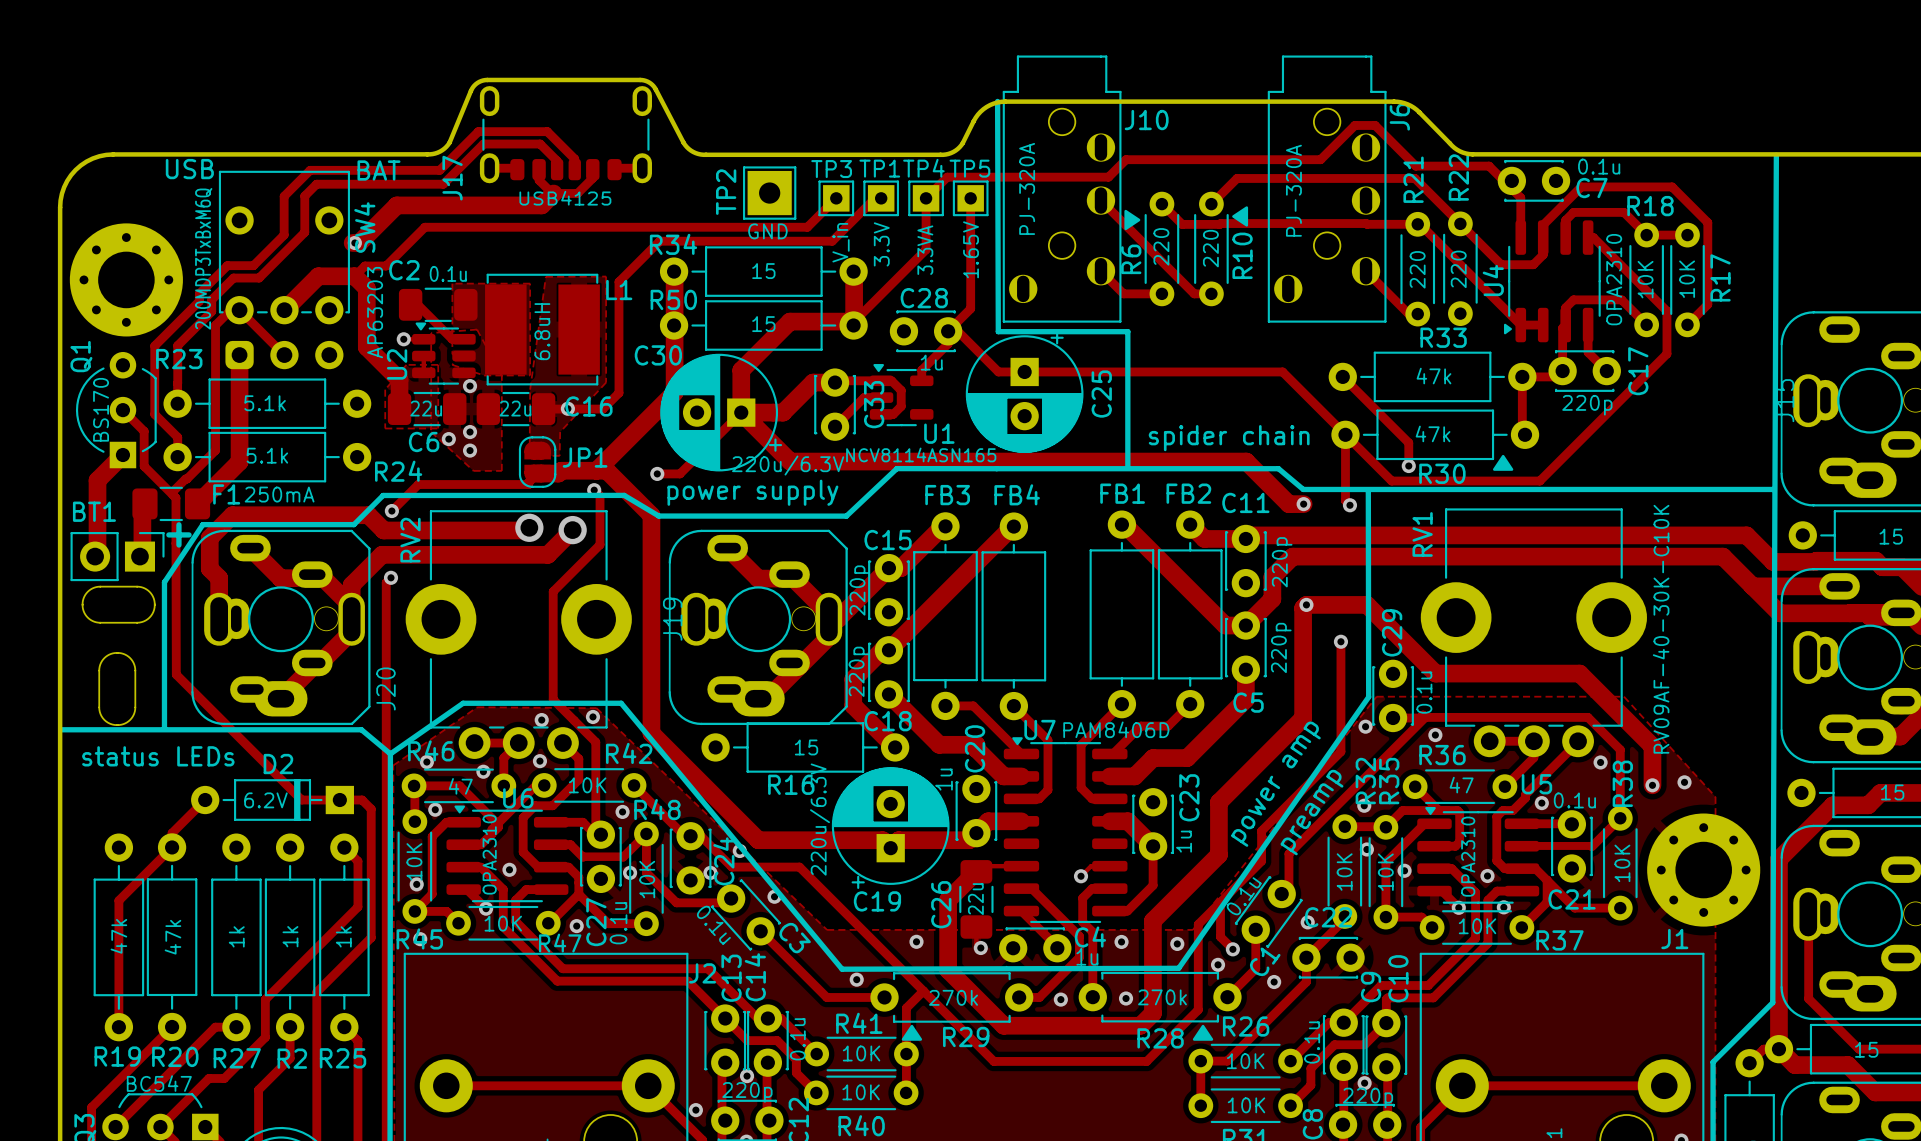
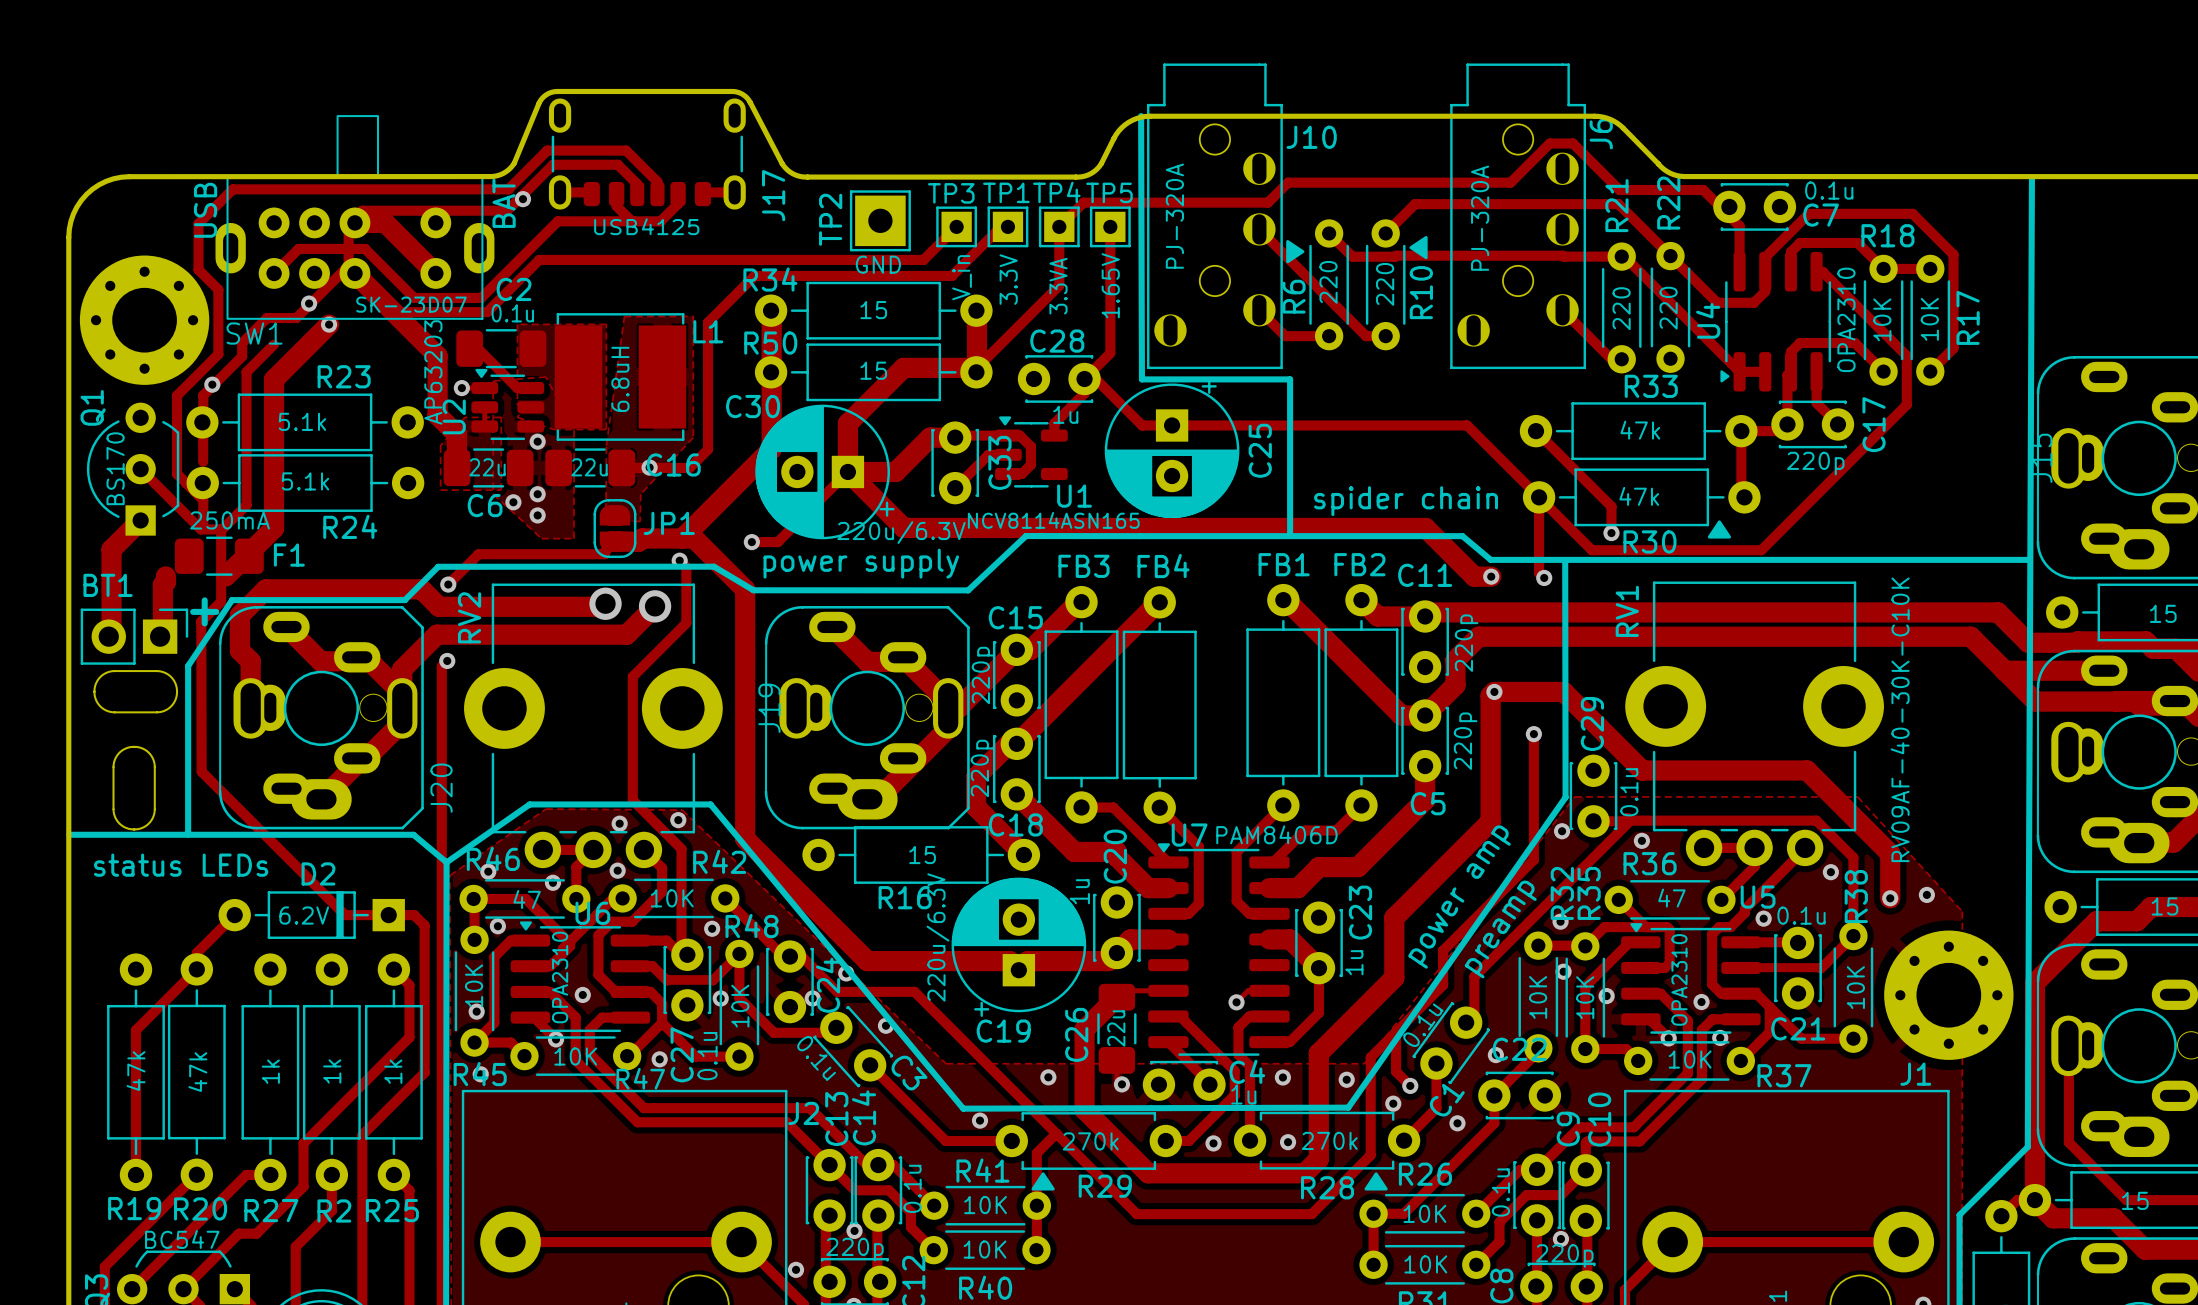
track: (444, 165) (439, 170) (310, 170) (284, 196) (284, 234) (253, 265) (227, 265) (199, 293) (199, 301) (190, 309) -> (508, 189) (232, 189) (198, 223) (198, 269) (218, 289) (218, 354)
text rotation: 0° (189, 169) -> 90° counterclockwise (205, 210)
text rotation: 0° (378, 170) -> 90° counterclockwise (504, 203)
text position: BAT (378, 170) -> BAT (504, 203)
via: none -> (522, 199)
J17 name position: J17 (452, 178) -> J17 (773, 195)
SW1: none -> SK-23D07 (354, 217)
track: none -> (631, 221) (557, 221) (481, 297) (414, 297) (365, 248) (298, 248) (274, 273)
track: (553, 193) (541, 205) (396, 205) (359, 242) (352, 242) -> none
track: none -> (354, 222) (385, 222) (435, 273)
track: (471, 227) (424, 227) (386, 266) (364, 266) (354, 276) -> (539, 259) (487, 312) (393, 312) (388, 307)
via: (354, 242) -> none
via: none -> (309, 303)
SW4: 200MDP3TxBxM6Q (284, 269) -> none
C2 name position: C2 (404, 270) -> C2 (514, 289)
track: (354, 276) (366, 288) (366, 347) (382, 362) -> (354, 273) (437, 356) (437, 415)
track: (354, 276) (318, 276) (284, 310) -> none
track: none -> (329, 324) (274, 379) (274, 406)
via: none -> (329, 324)
track: (239, 310) (284, 355) -> none
U2 value position: AP63203 (375, 312) -> AP63203 (433, 372)
via: none -> (212, 384)
R23 name position: R23 (179, 359) -> R23 (344, 376)
R23 position: (267, 403) -> (305, 422)
track: (144, 431) (144, 466) (175, 498) (175, 543) -> (221, 530) (221, 601) (201, 621)
track: none -> (164, 493) (200, 529) (221, 530)
track: (215, 441) (215, 450) (173, 491) (173, 495) -> (246, 505) (221, 530)
R24 position: (267, 457) -> (305, 483)
R24 name position: R24 (398, 471) -> R24 (350, 526)
F1 name position: F1 (226, 494) -> F1 (289, 555)
F1 value position: 250mA (279, 494) -> 250mA (230, 520)
F1 position: (171, 503) -> (219, 556)

